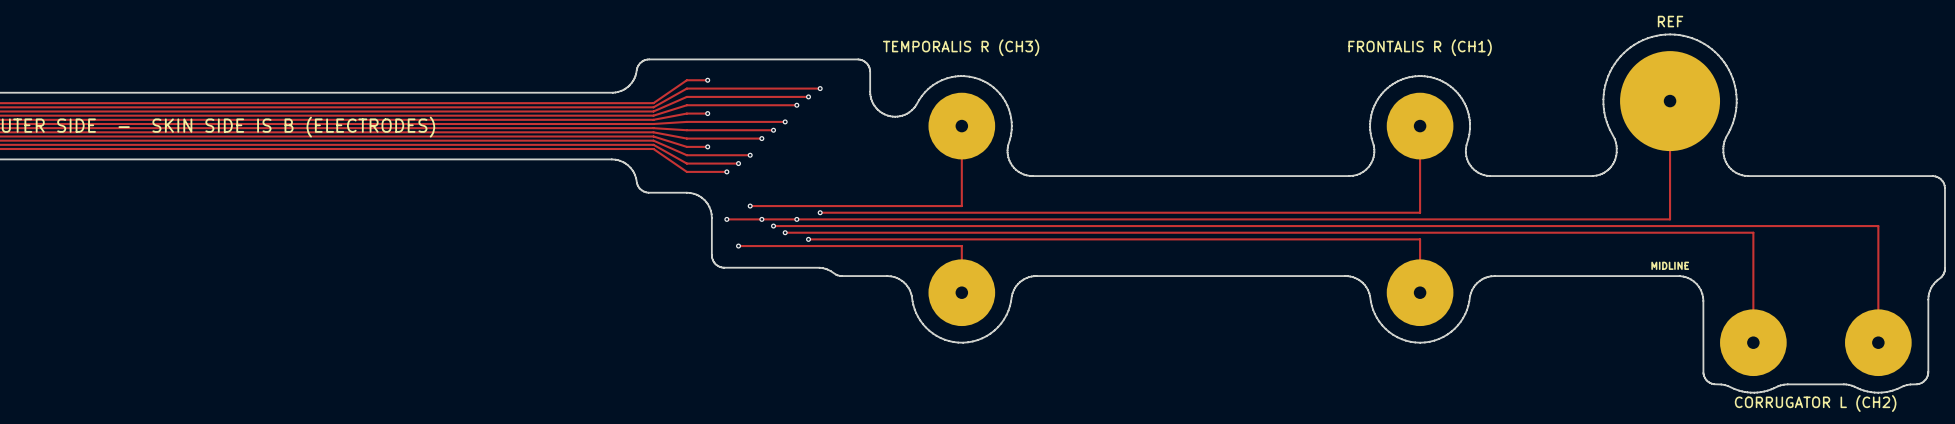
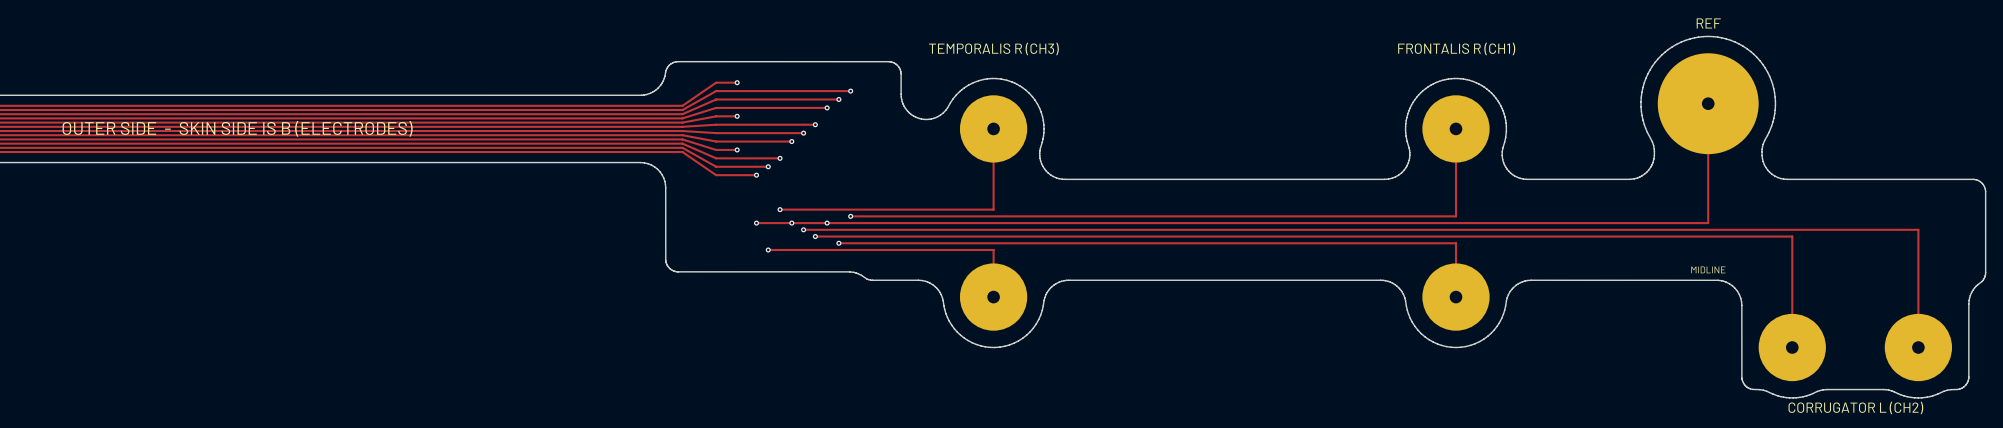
board edge: (615, 159) (630, 167) (638, 186) (643, 191) (690, 192) (704, 200) (711, 214) (712, 257) (718, 266) (823, 268) -> (644, 162) (657, 169) (664, 181) (665, 260) (672, 270) (853, 272)

